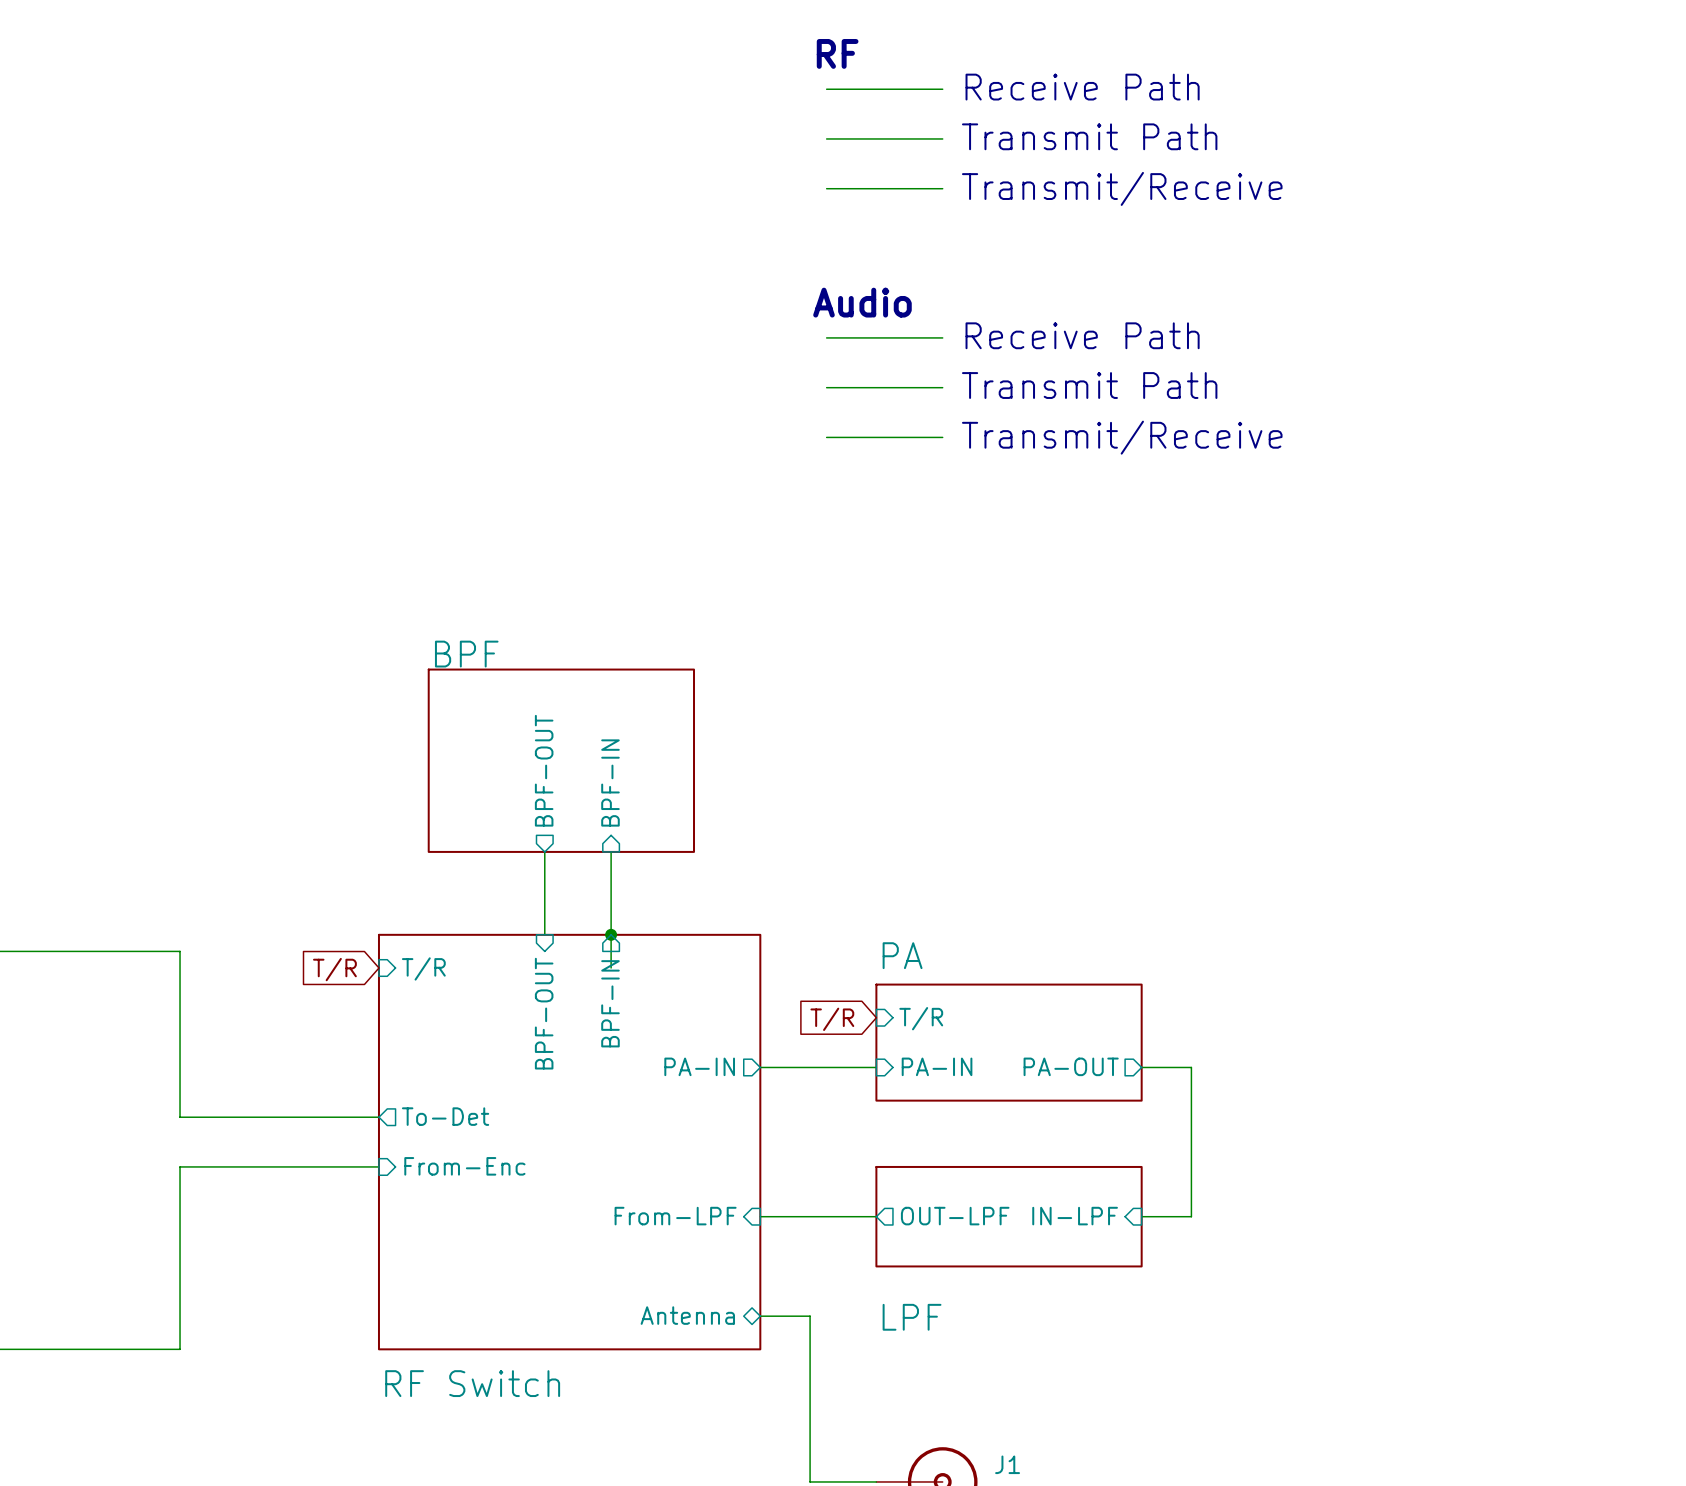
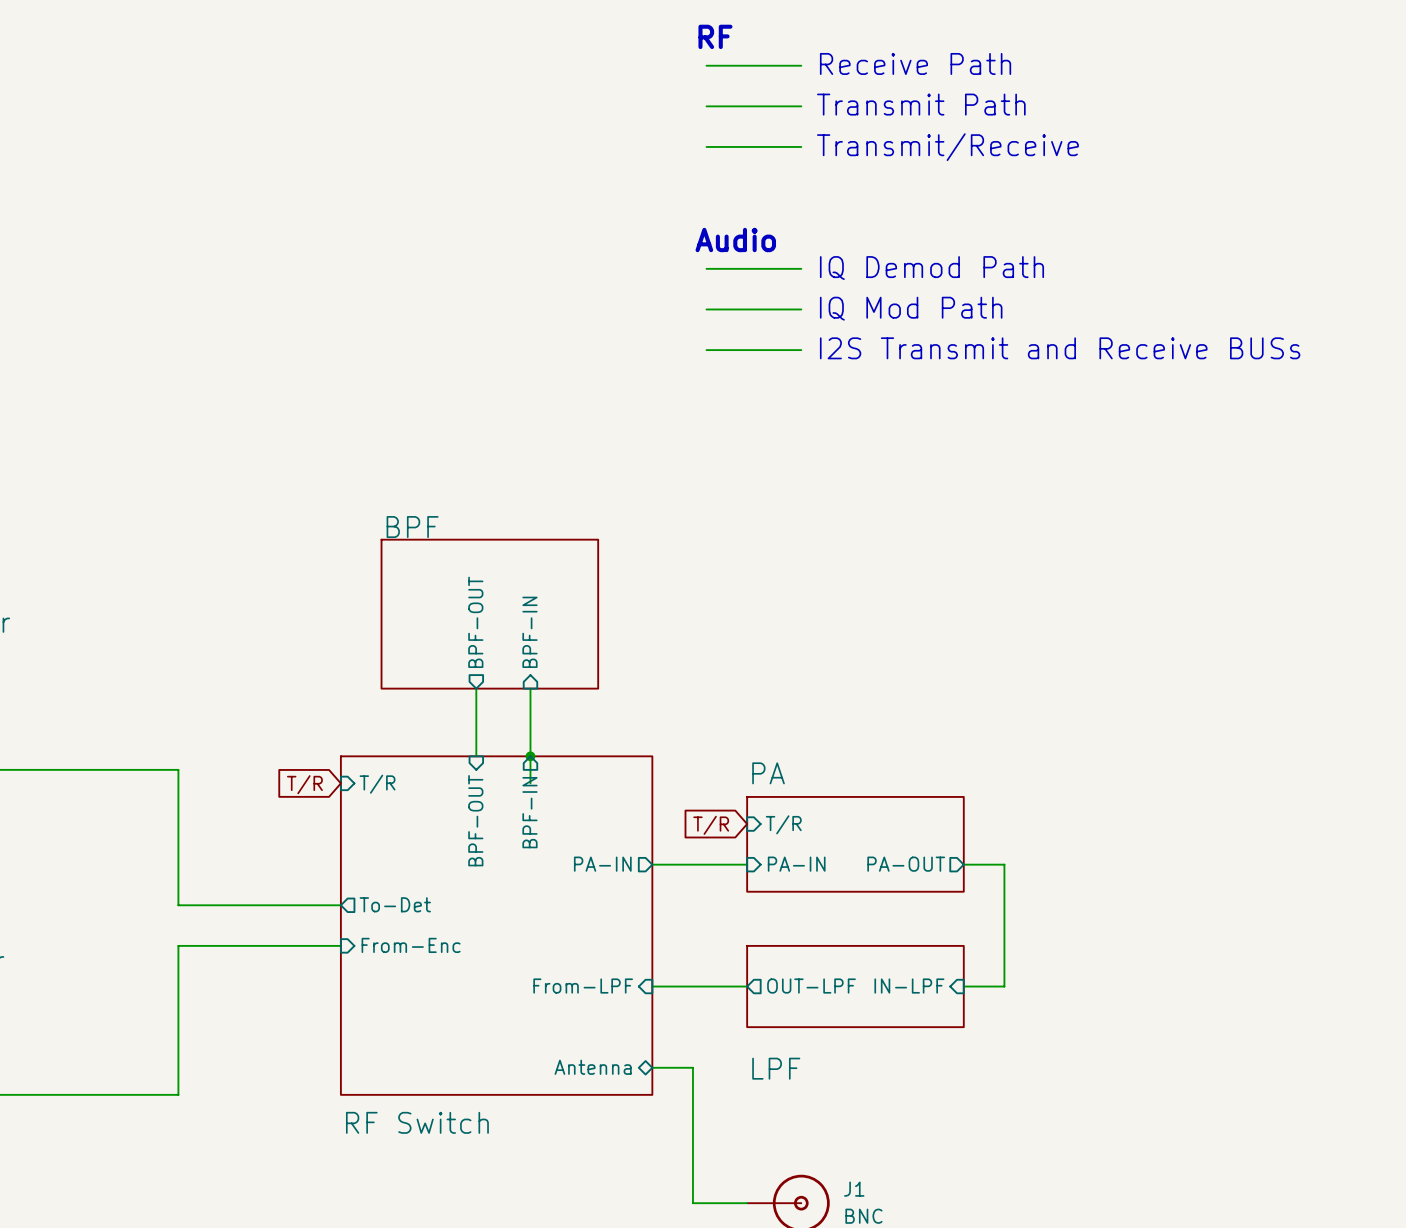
text: Receive Path (1082, 335) -> IQ Demod Path (931, 268)
text: Transmit Path (1089, 385) -> IQ Mod Path (911, 308)
text: Transmit/Receive (1122, 437) -> I2S Transmit and Receive BUSs (1060, 348)

